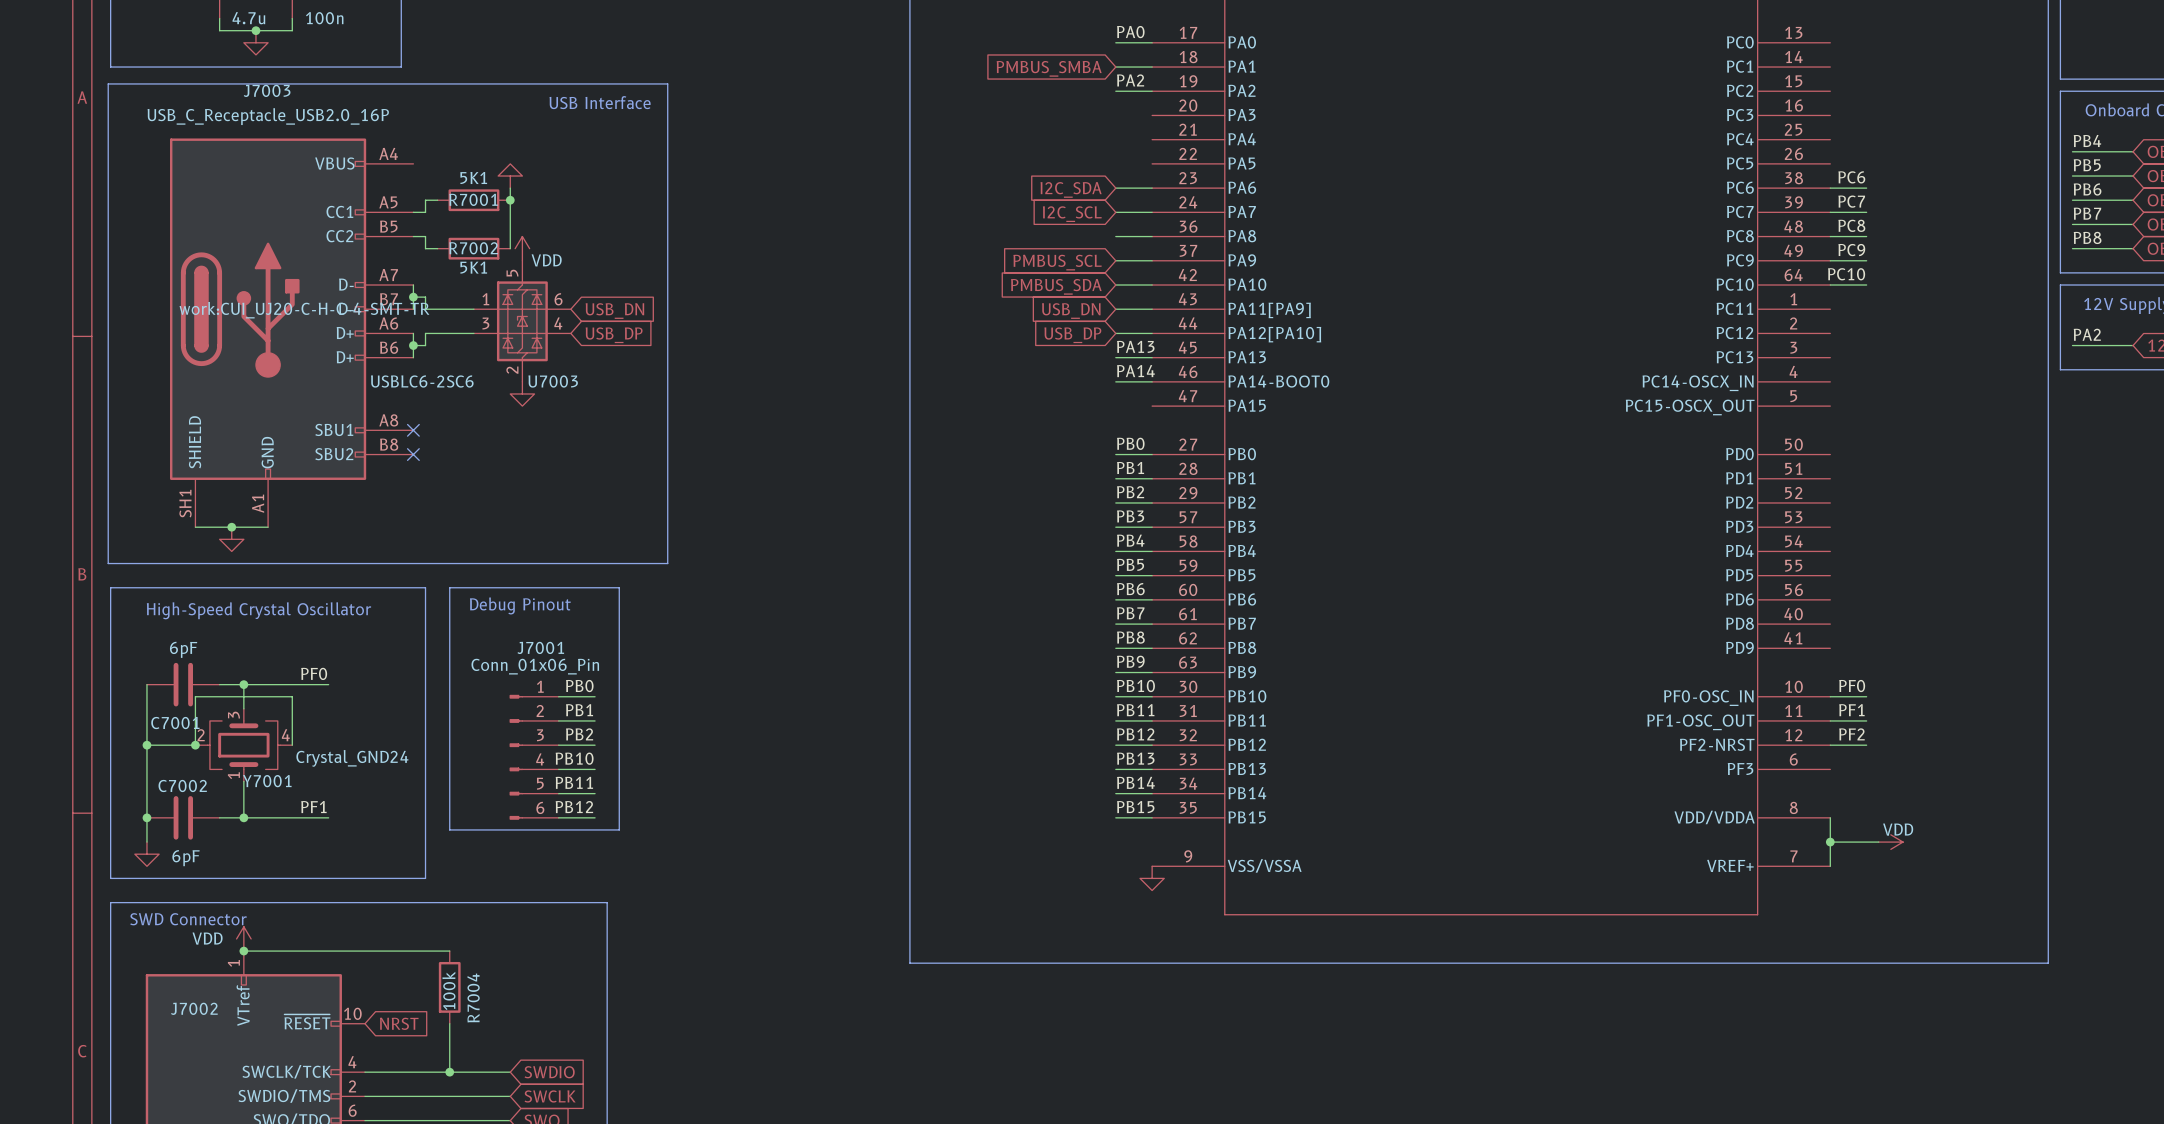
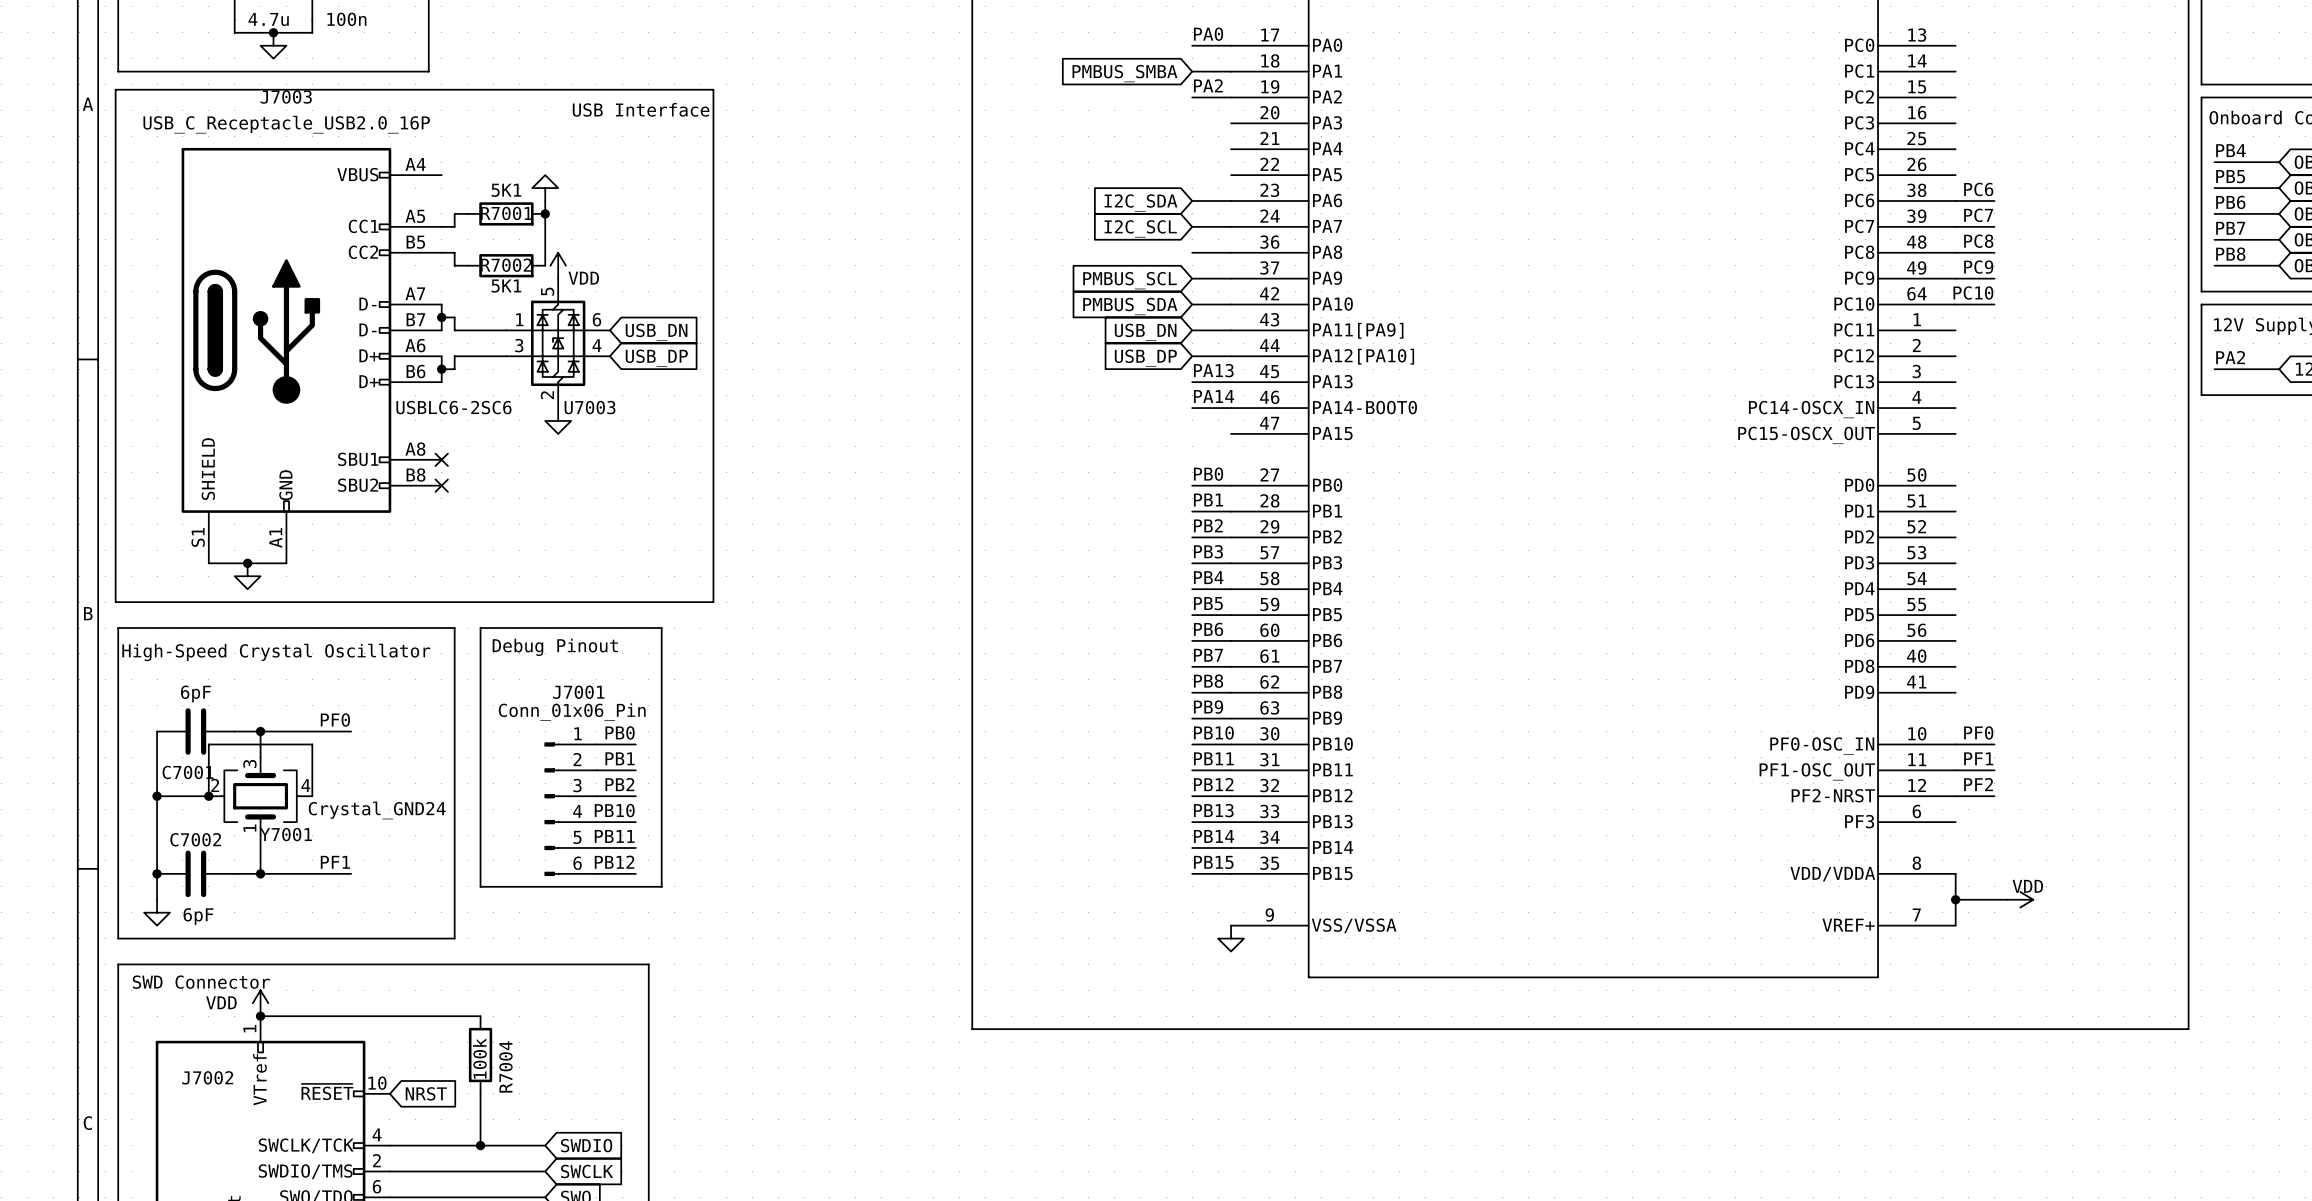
J7003 text: work:CUI_UJ20-C-H-C-4-SMT-TR (304, 310) -> none
J7003 pin number: SH1 (185, 503) -> S1 (198, 537)

